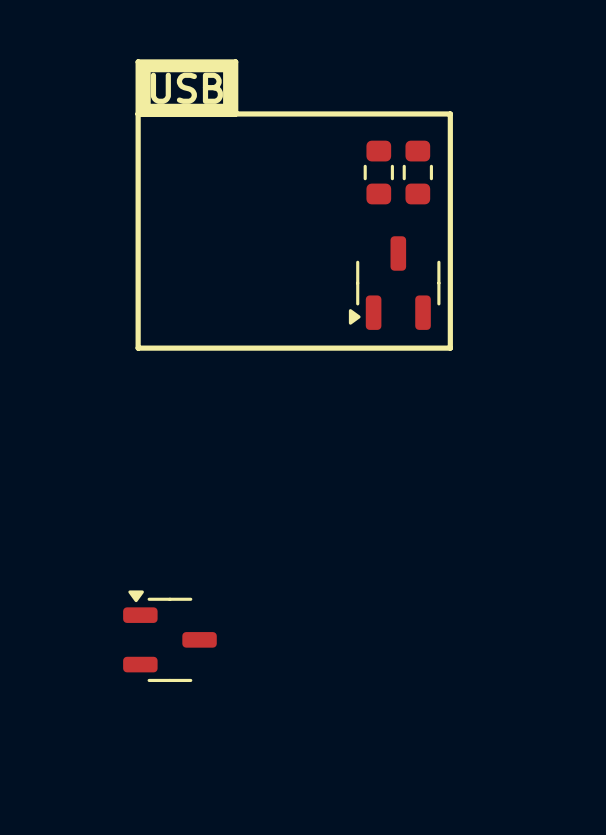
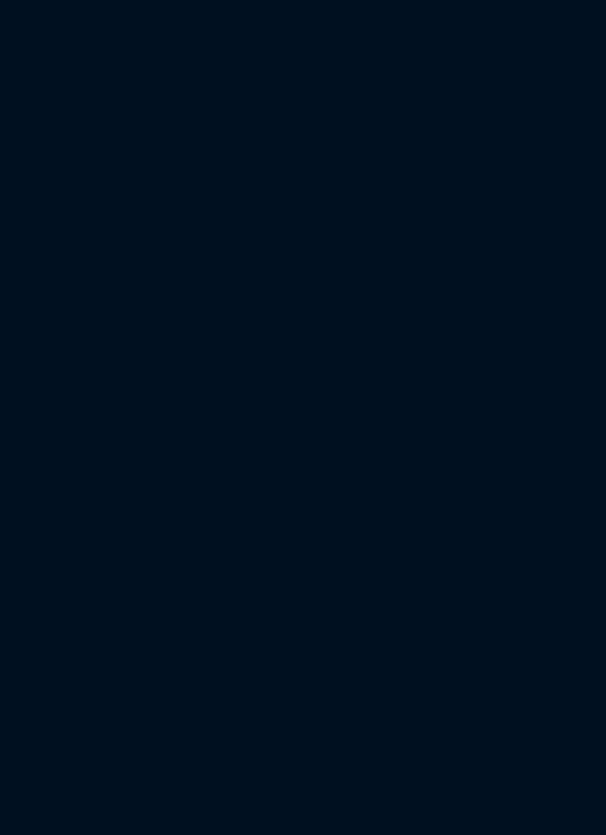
drawing: [138, 61, 236, 115] -> none
text: USB (186, 88) -> none
line: (138, 113) (450, 113) (450, 348) (138, 348) (138, 61) (235, 61) (235, 113) -> none
part: (378, 172) -> none
part: (417, 172) -> none
part: (394, 283) -> none
part: (169, 636) -> none

